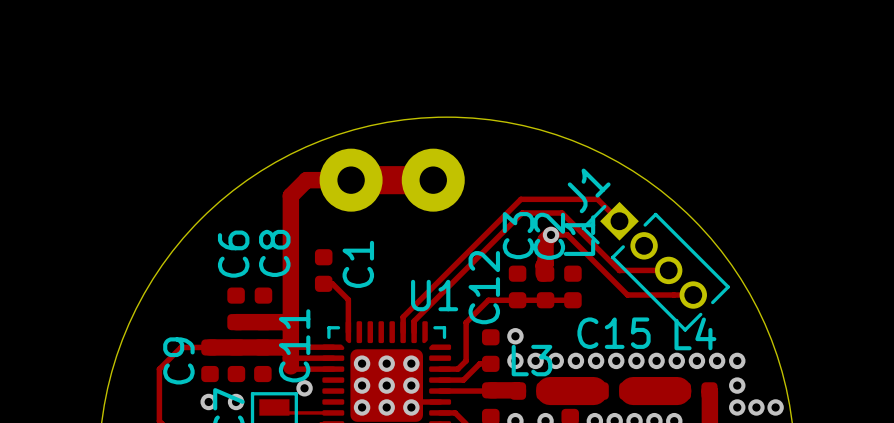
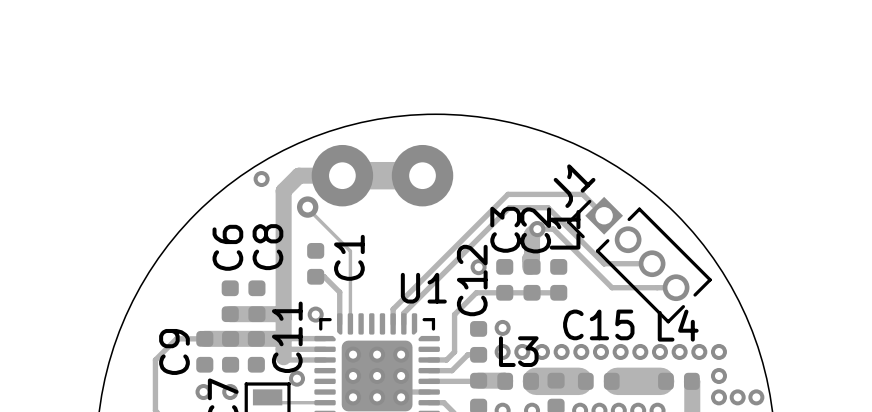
via: none -> (261, 179)
track: none -> (305, 205) (350, 251) (350, 323)
via: none -> (307, 207)
via: none -> (478, 267)
via: none -> (315, 314)

